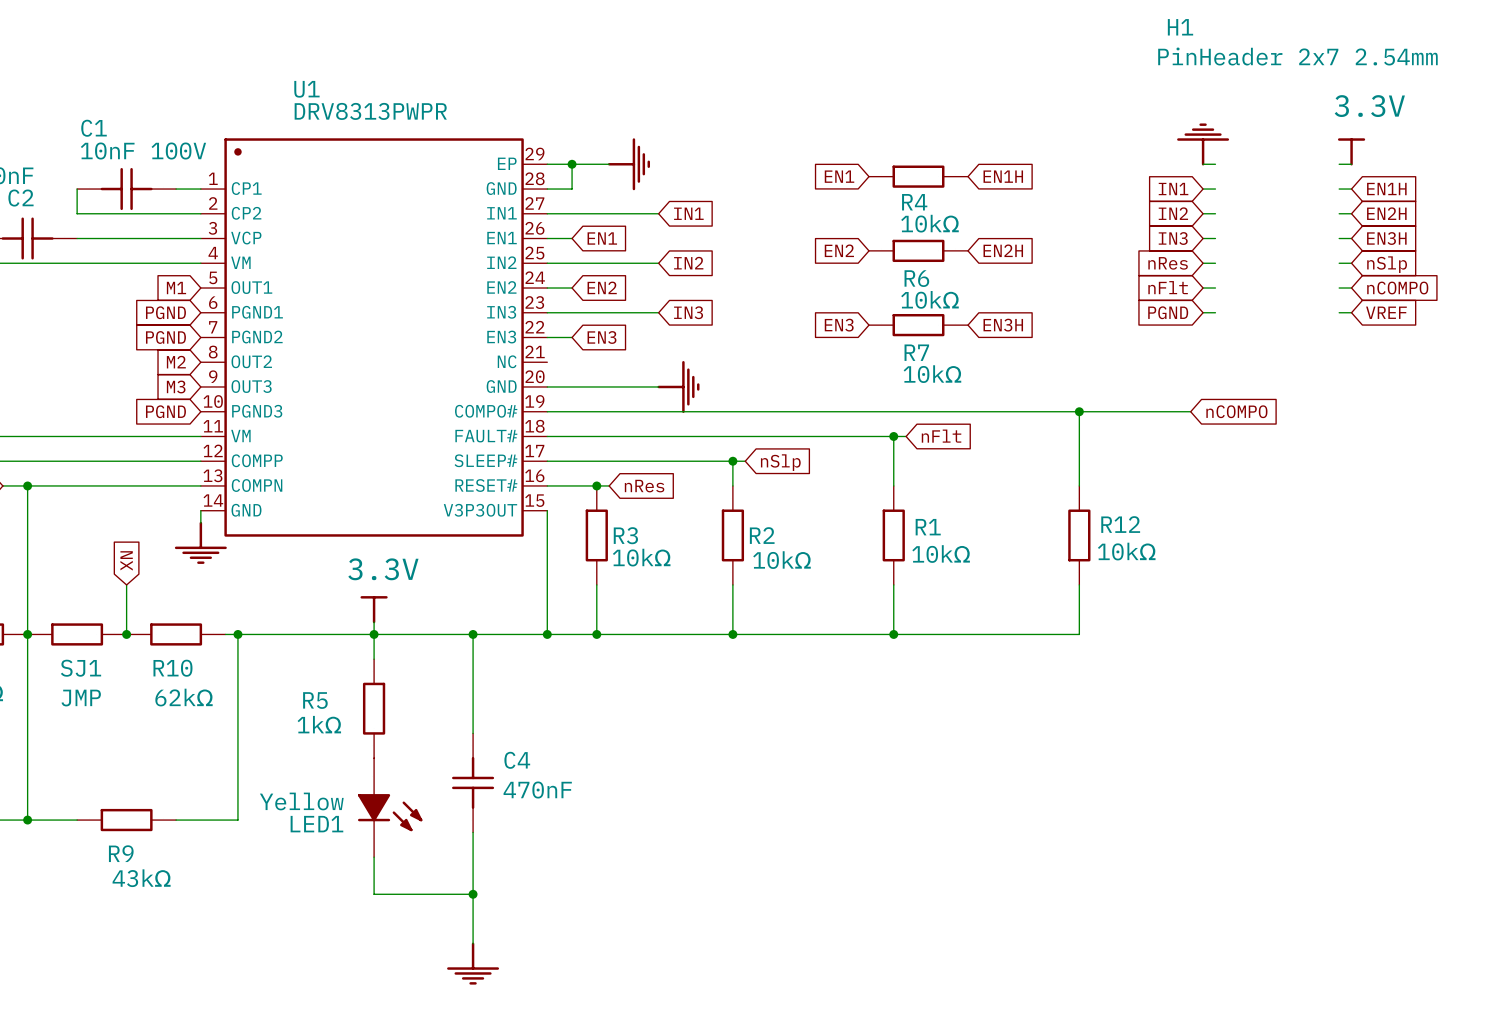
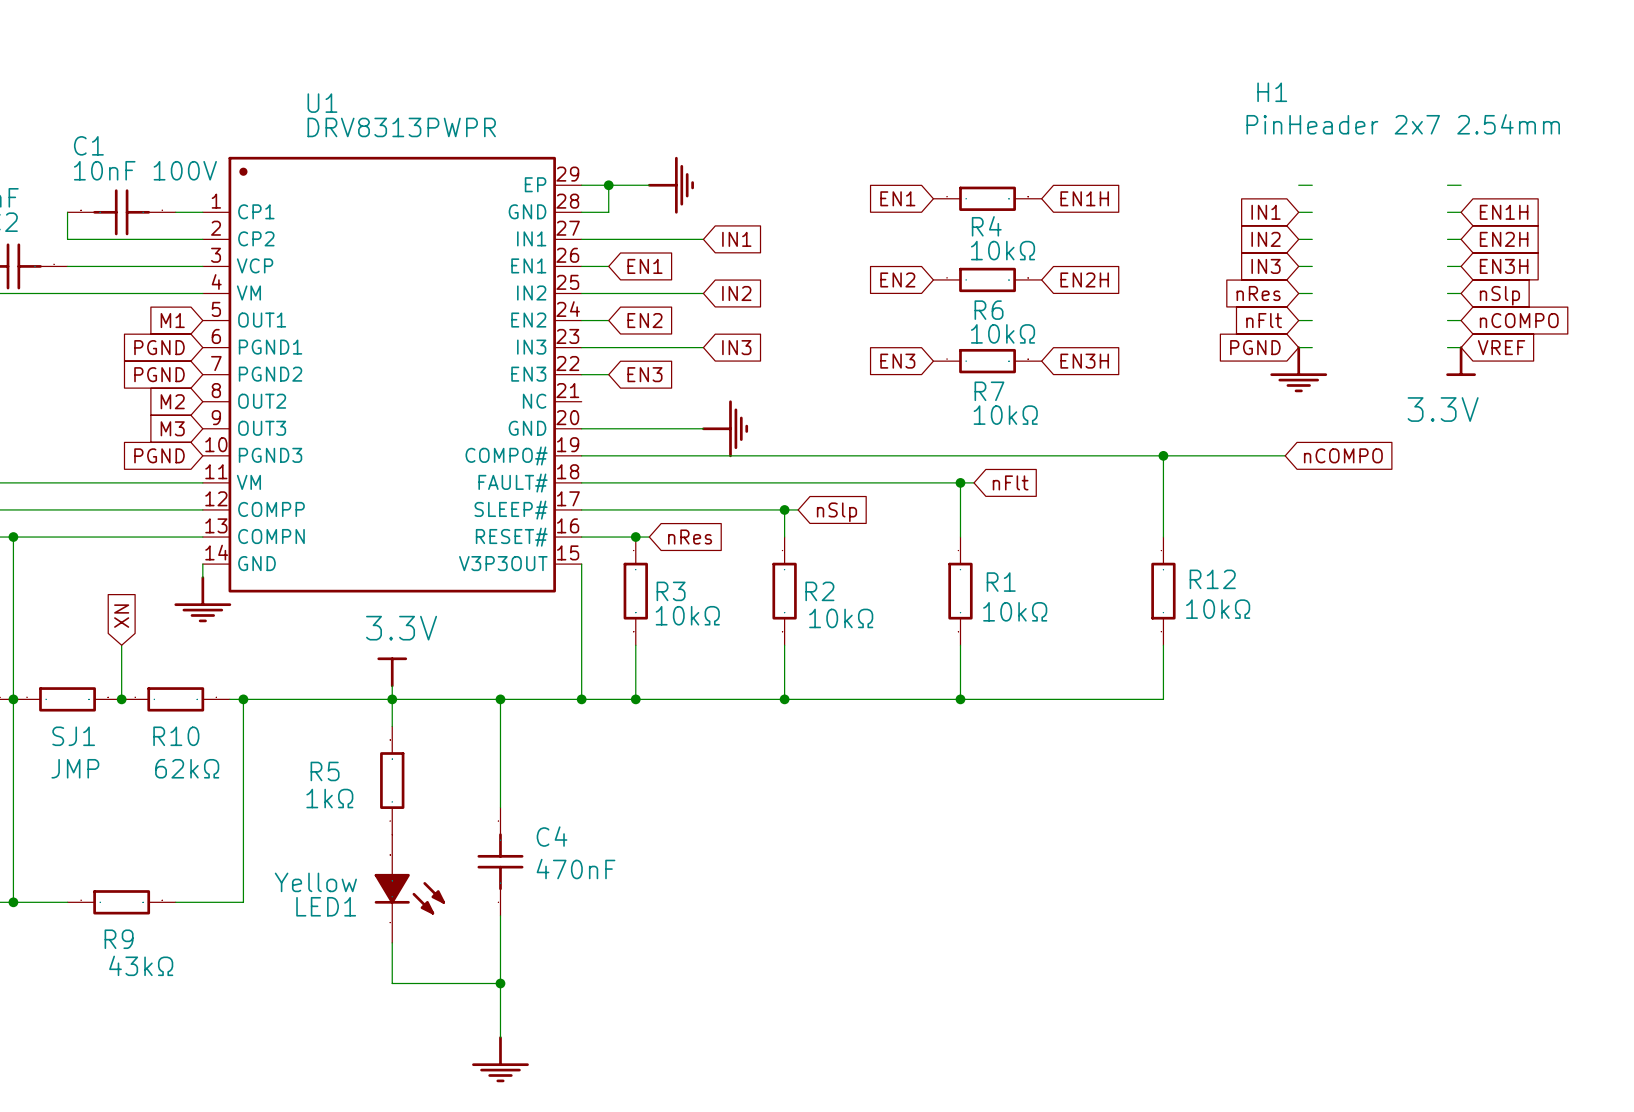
H1 position: (1297, 42) -> (1403, 108)
power symbol rotation: 0° (1203, 144) -> 180° (1298, 369)
power symbol position: (1203, 144) -> (1298, 369)
power symbol rotation: 0° (1351, 151) -> 180° (1461, 361)
power symbol position: 3.3V (1351, 151) -> 3.3V (1461, 361)

